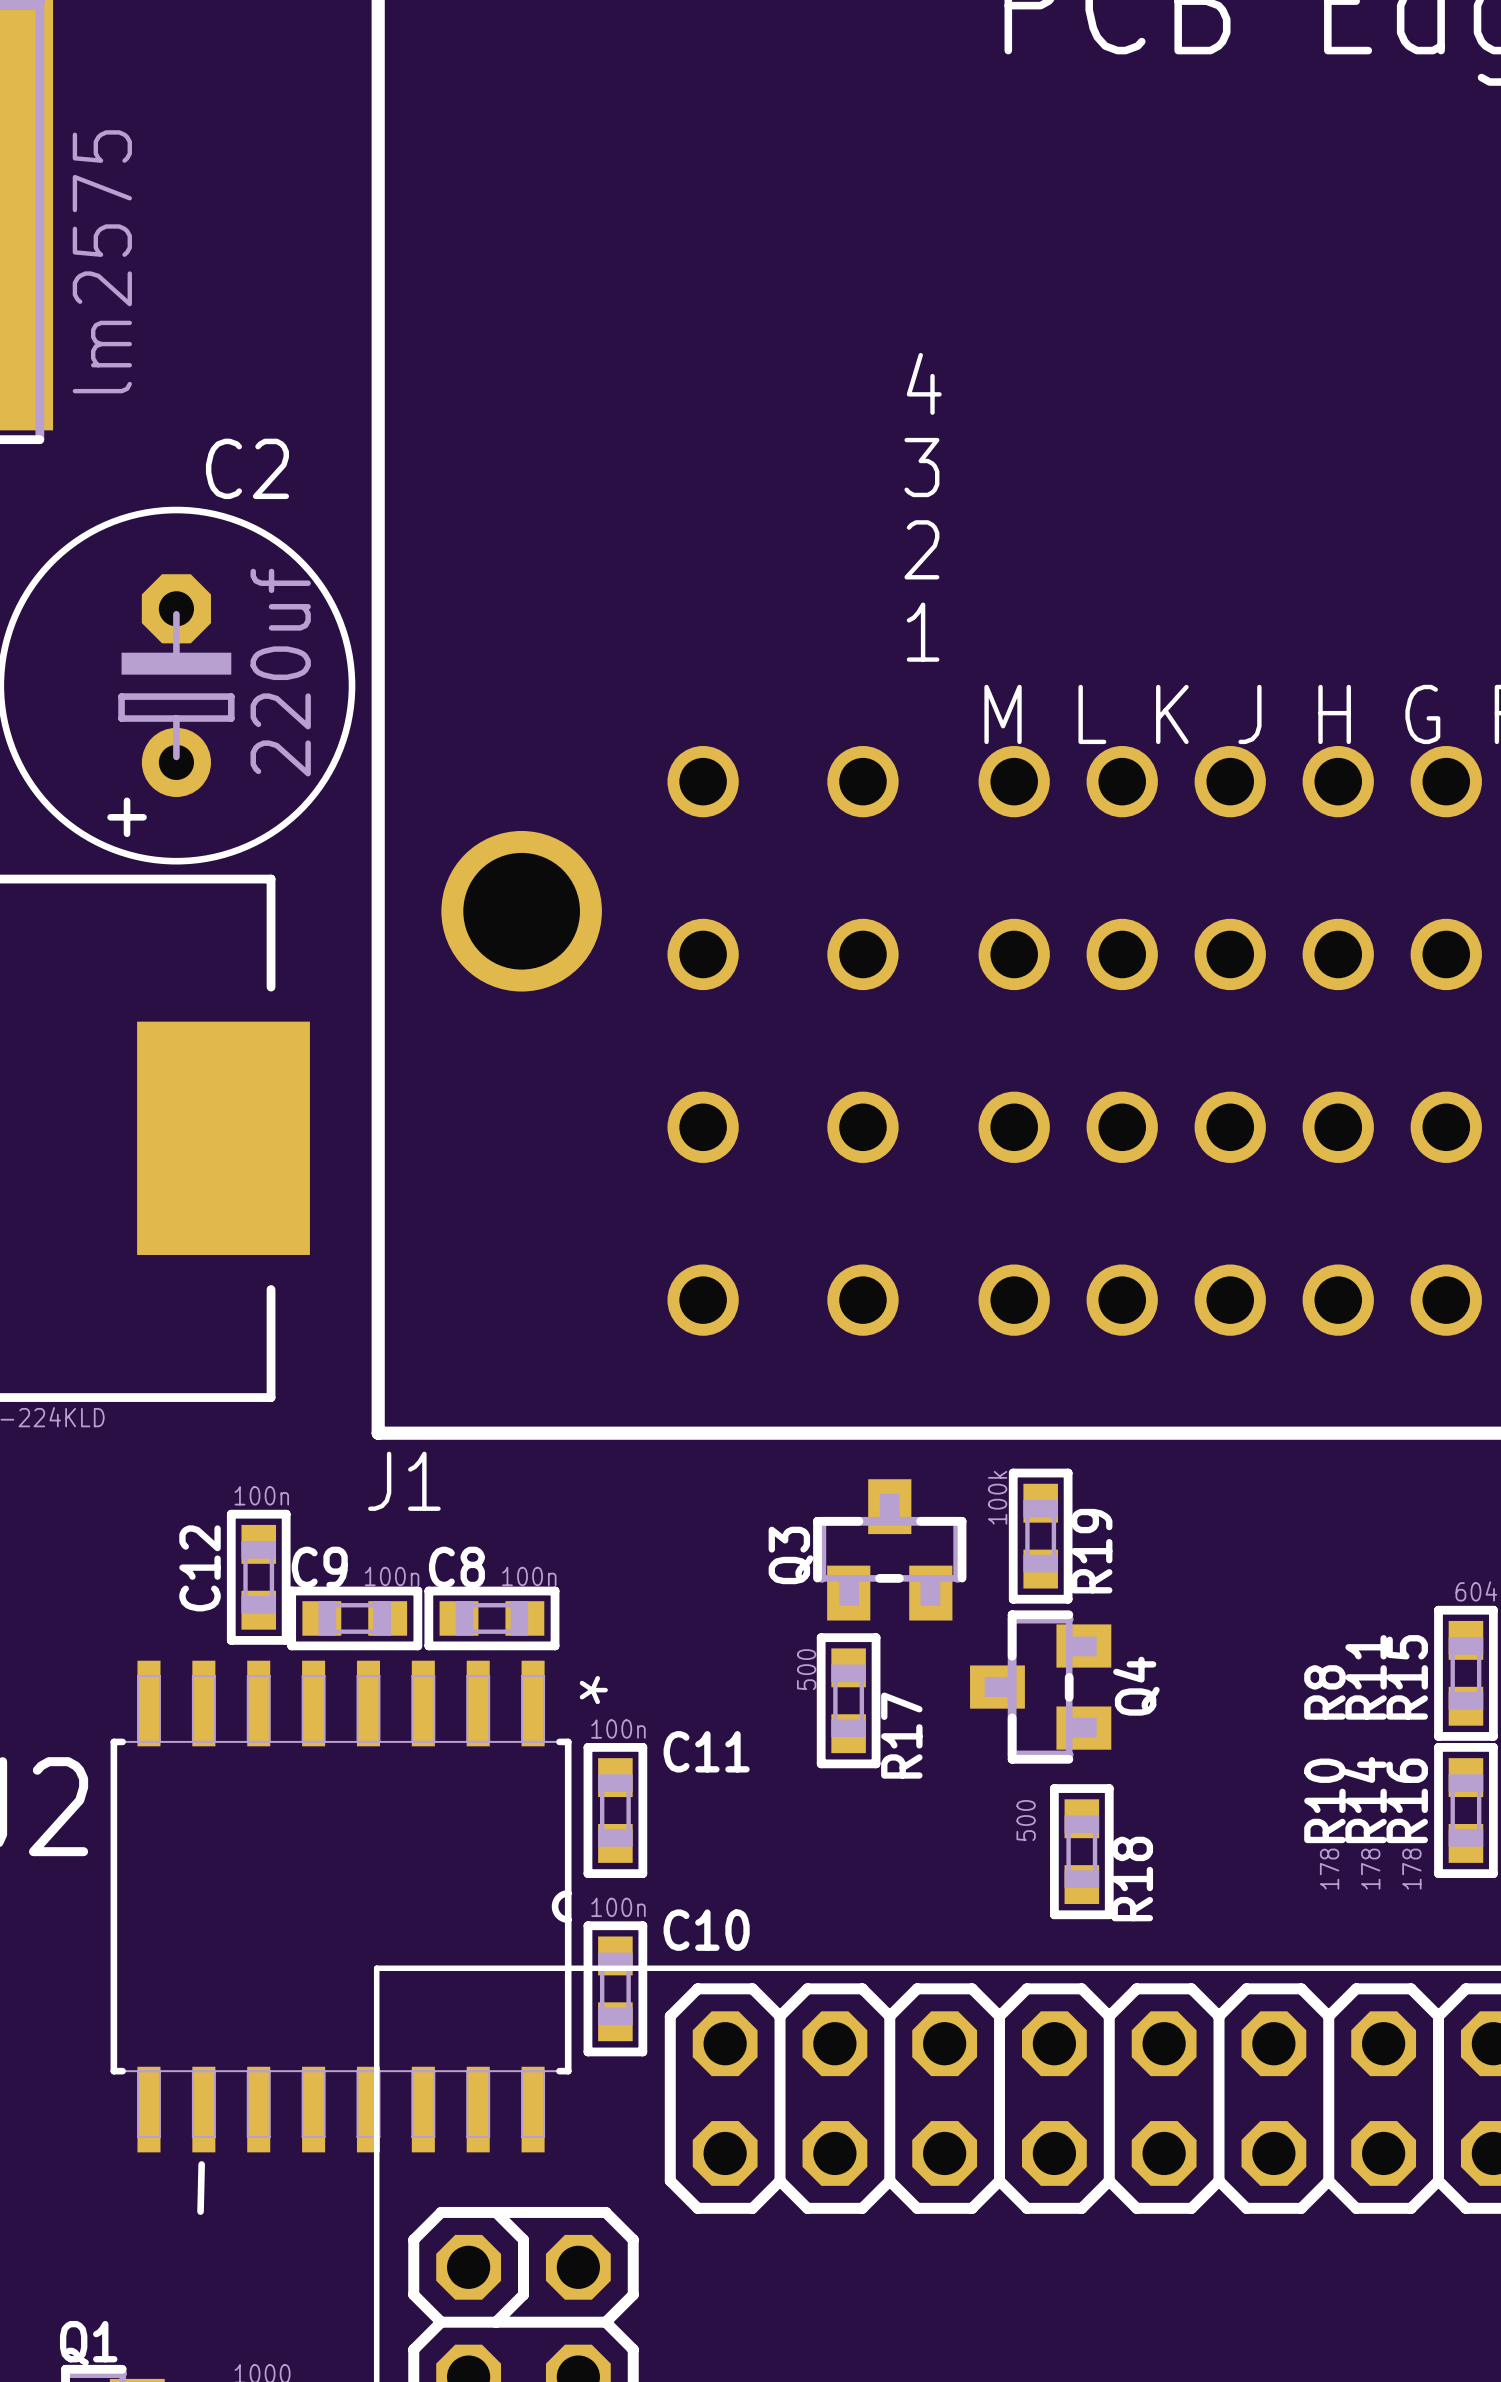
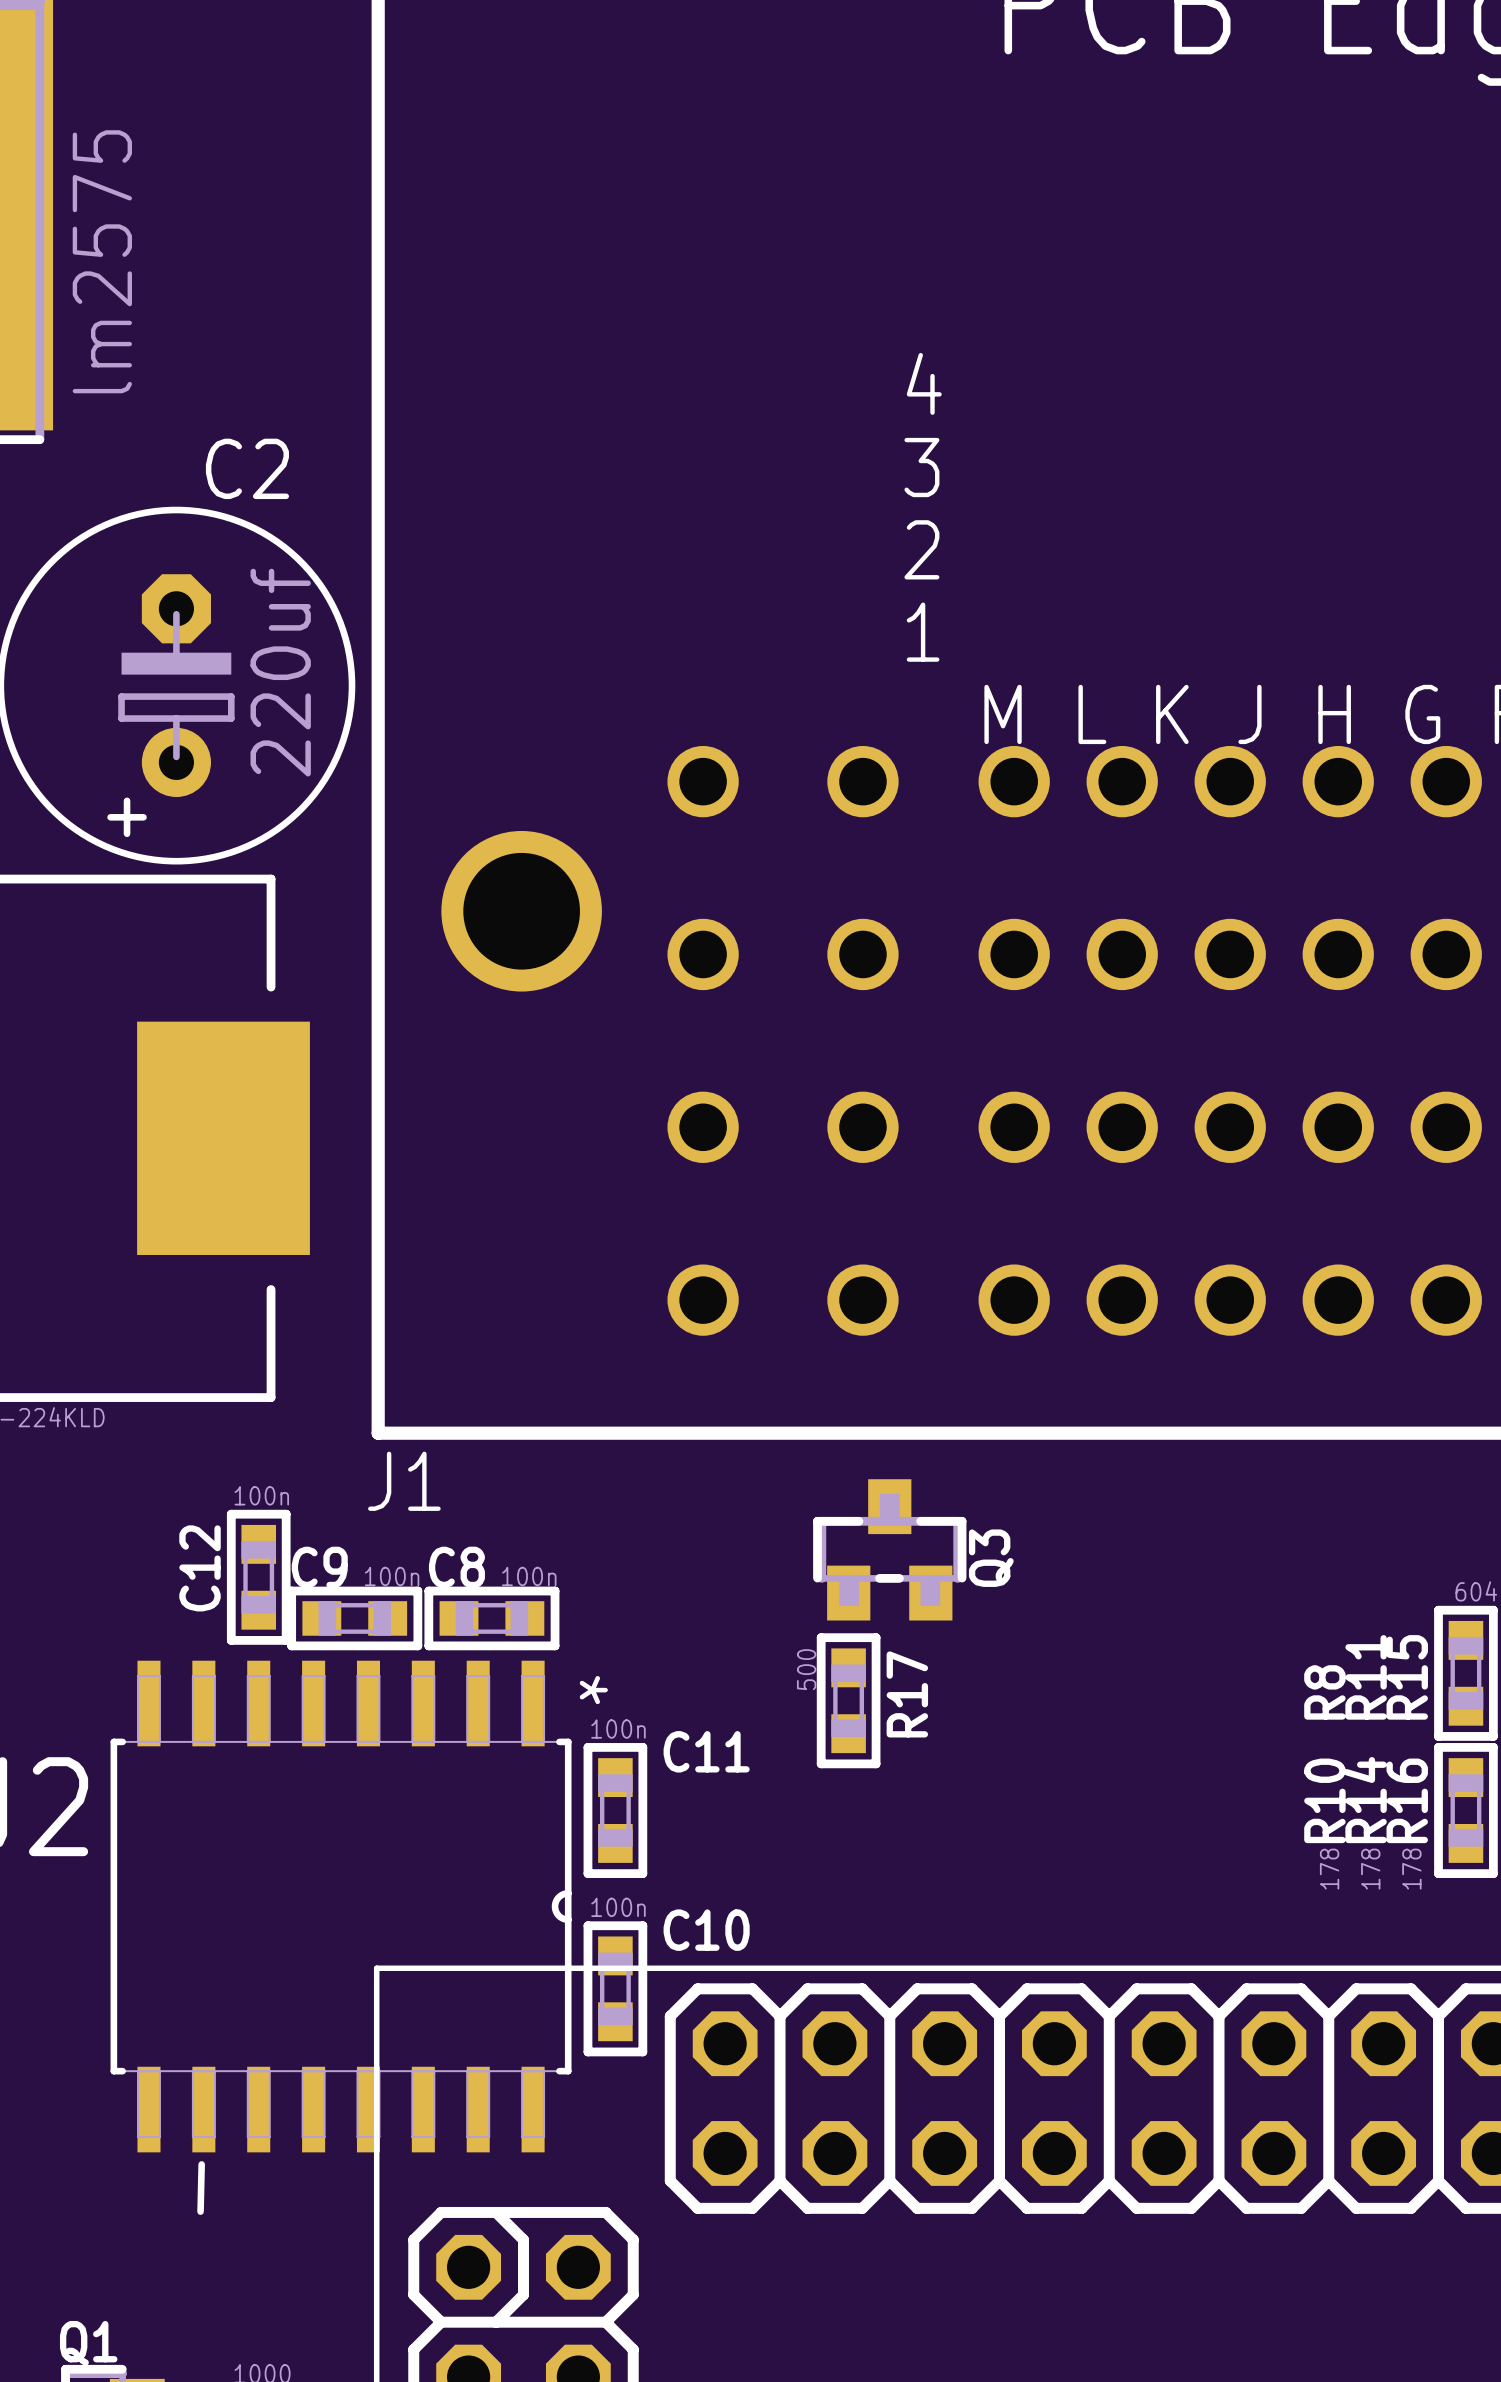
R19: 100k (1040, 1536) -> none
Q3 name position: Q3 (791, 1555) -> Q3 (991, 1558)
Q4: (1040, 1687) -> none
R17 name position: R17 (901, 1735) -> R17 (907, 1694)
R18: 500 (1081, 1851) -> none

